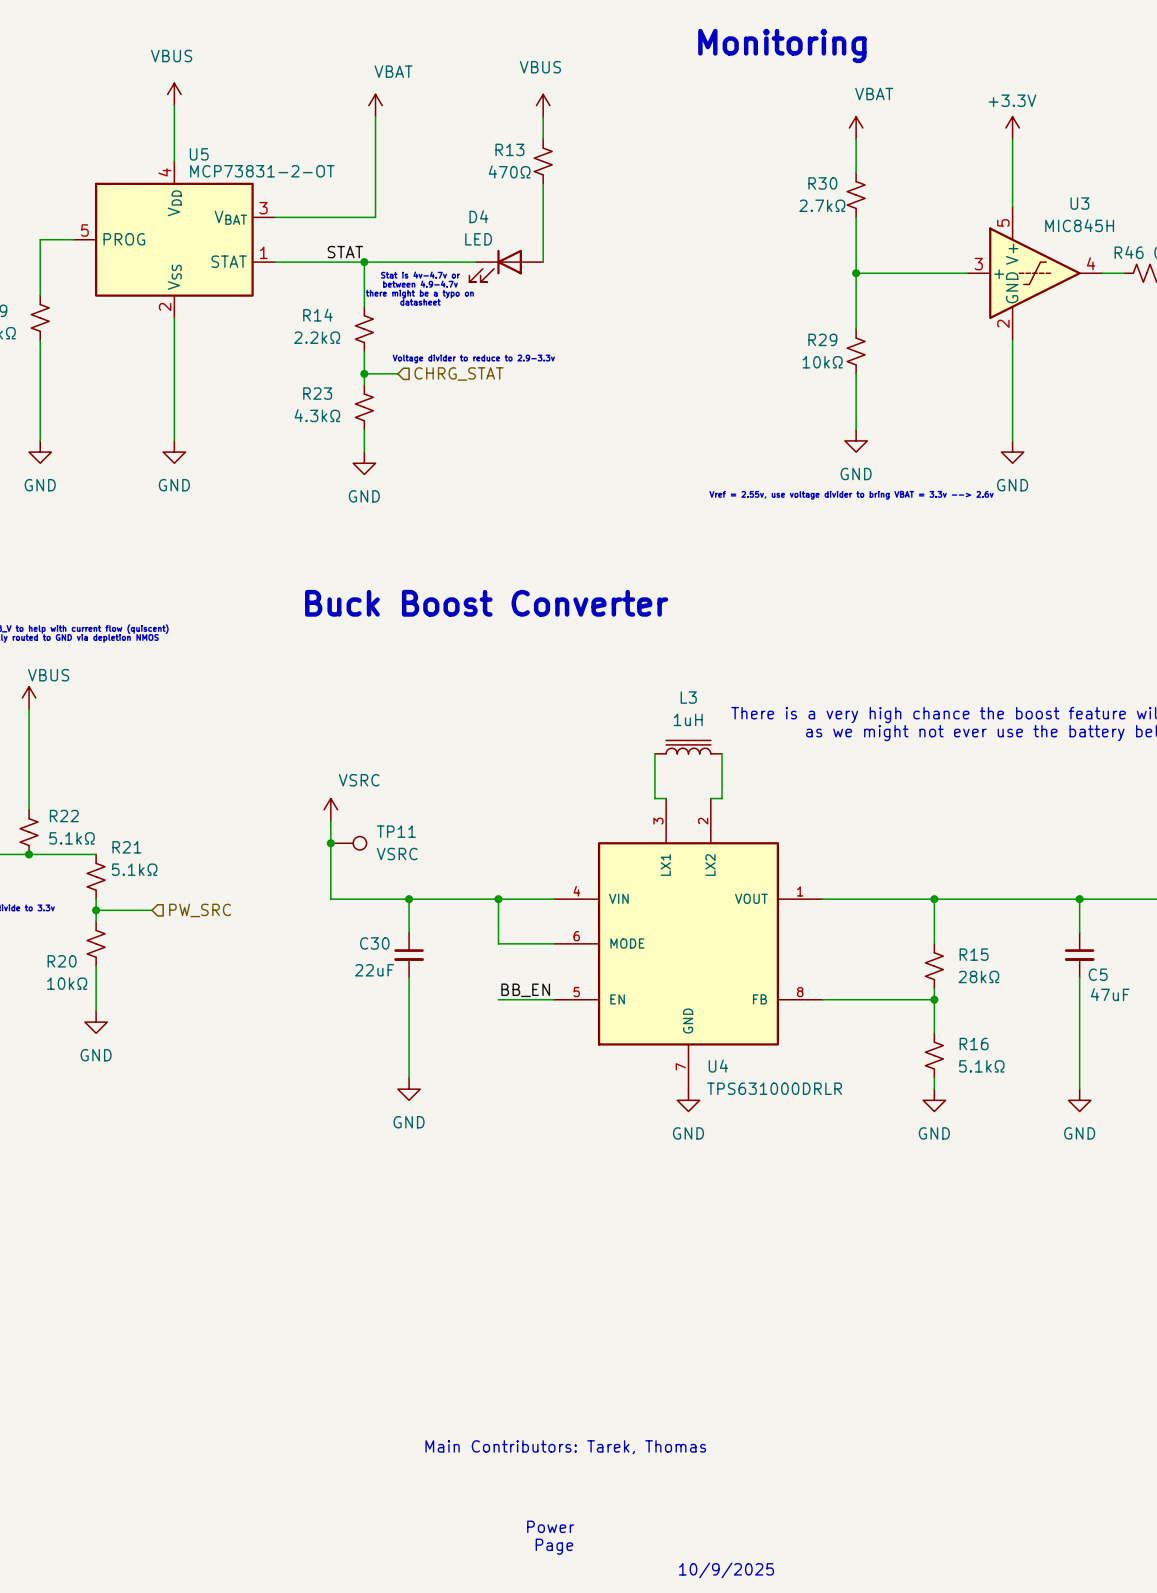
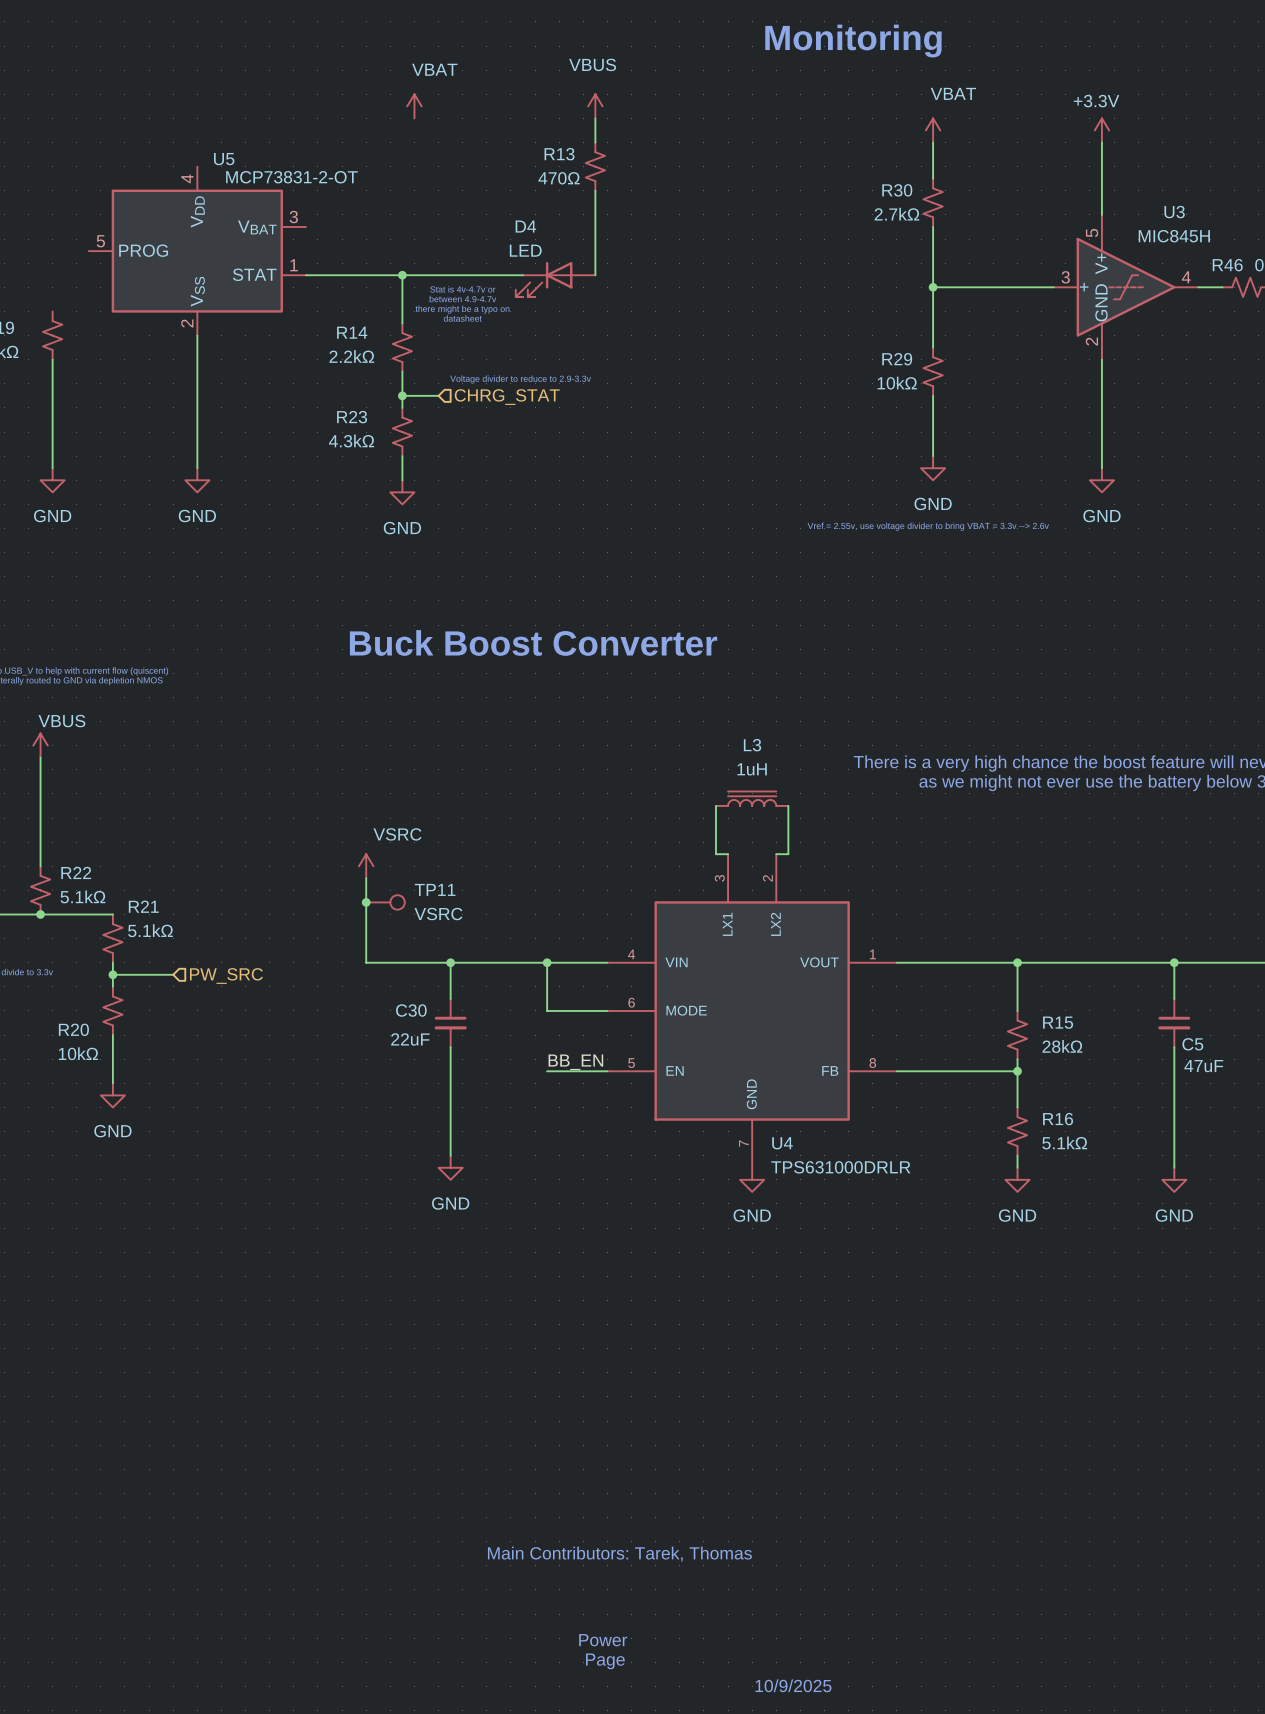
power symbol: VBUS (174, 94) -> none
wire: (174, 105) (174, 161) -> none
wire: (375, 116) (375, 217) (274, 217) -> none
wire: (73, 239) (40, 239) (40, 295) -> none
label: STAT (345, 252) -> none

